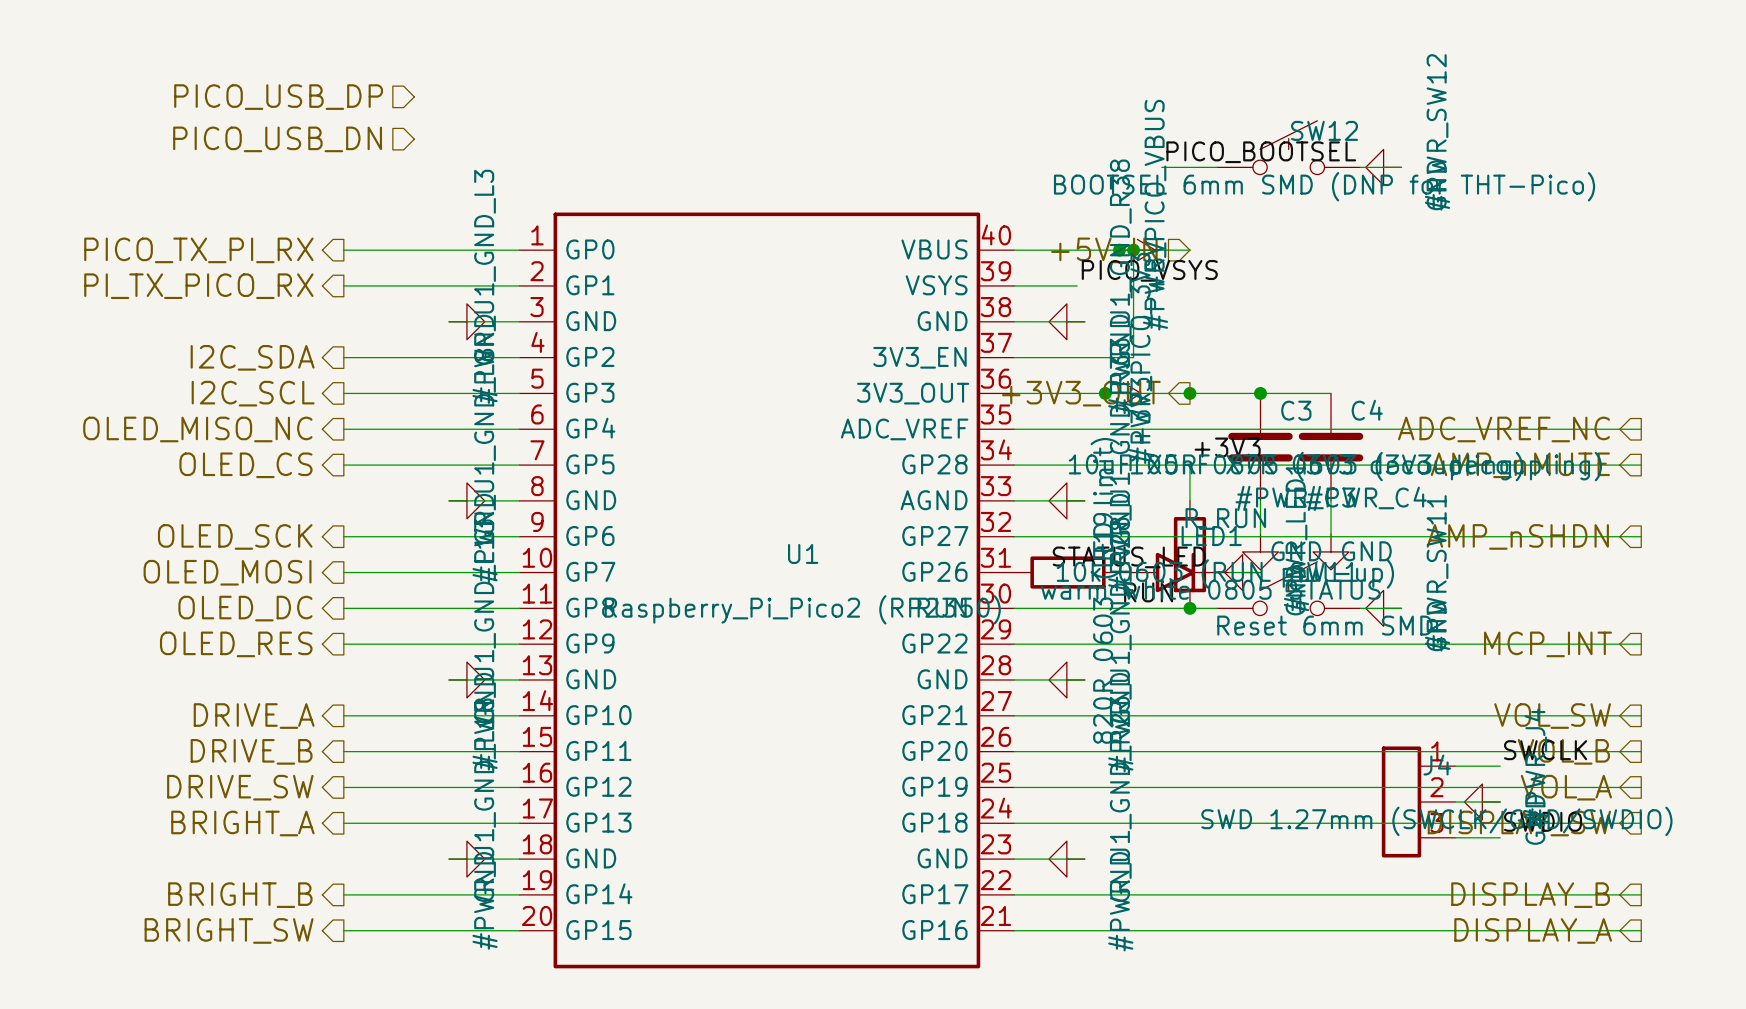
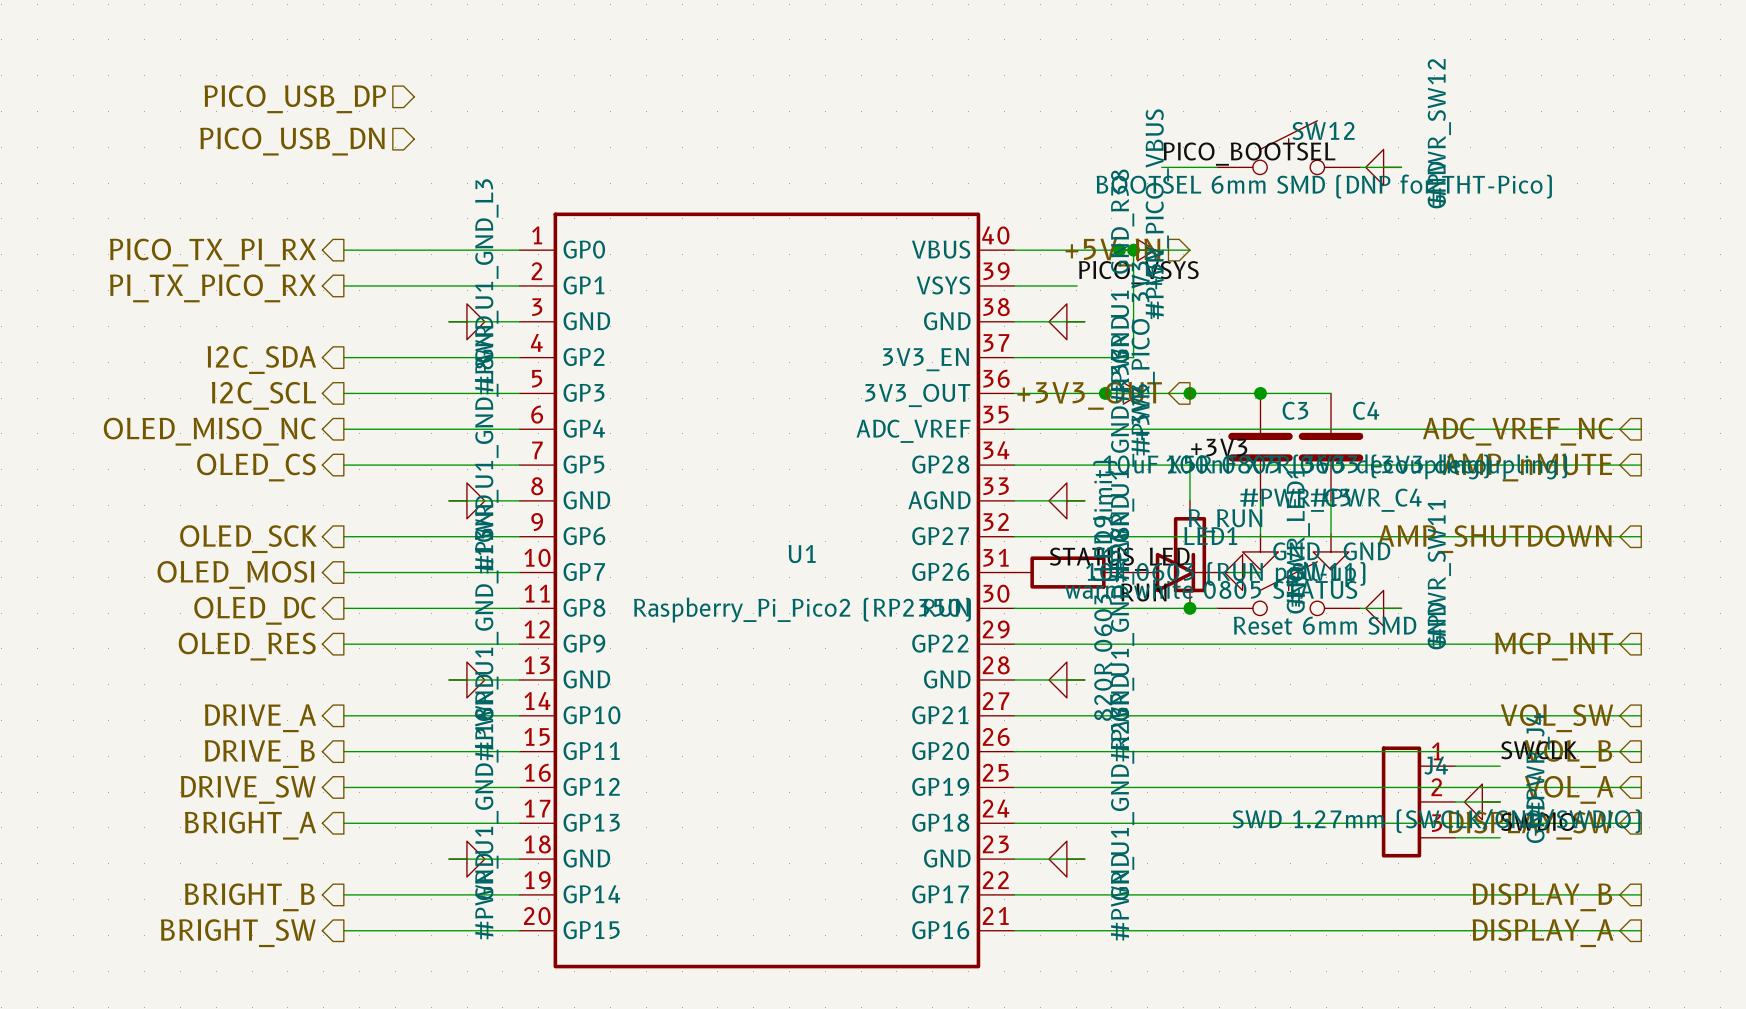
hierarchical label: AMP_nSHDN (1517, 536) -> AMP_SHUTDOWN (1494, 539)

